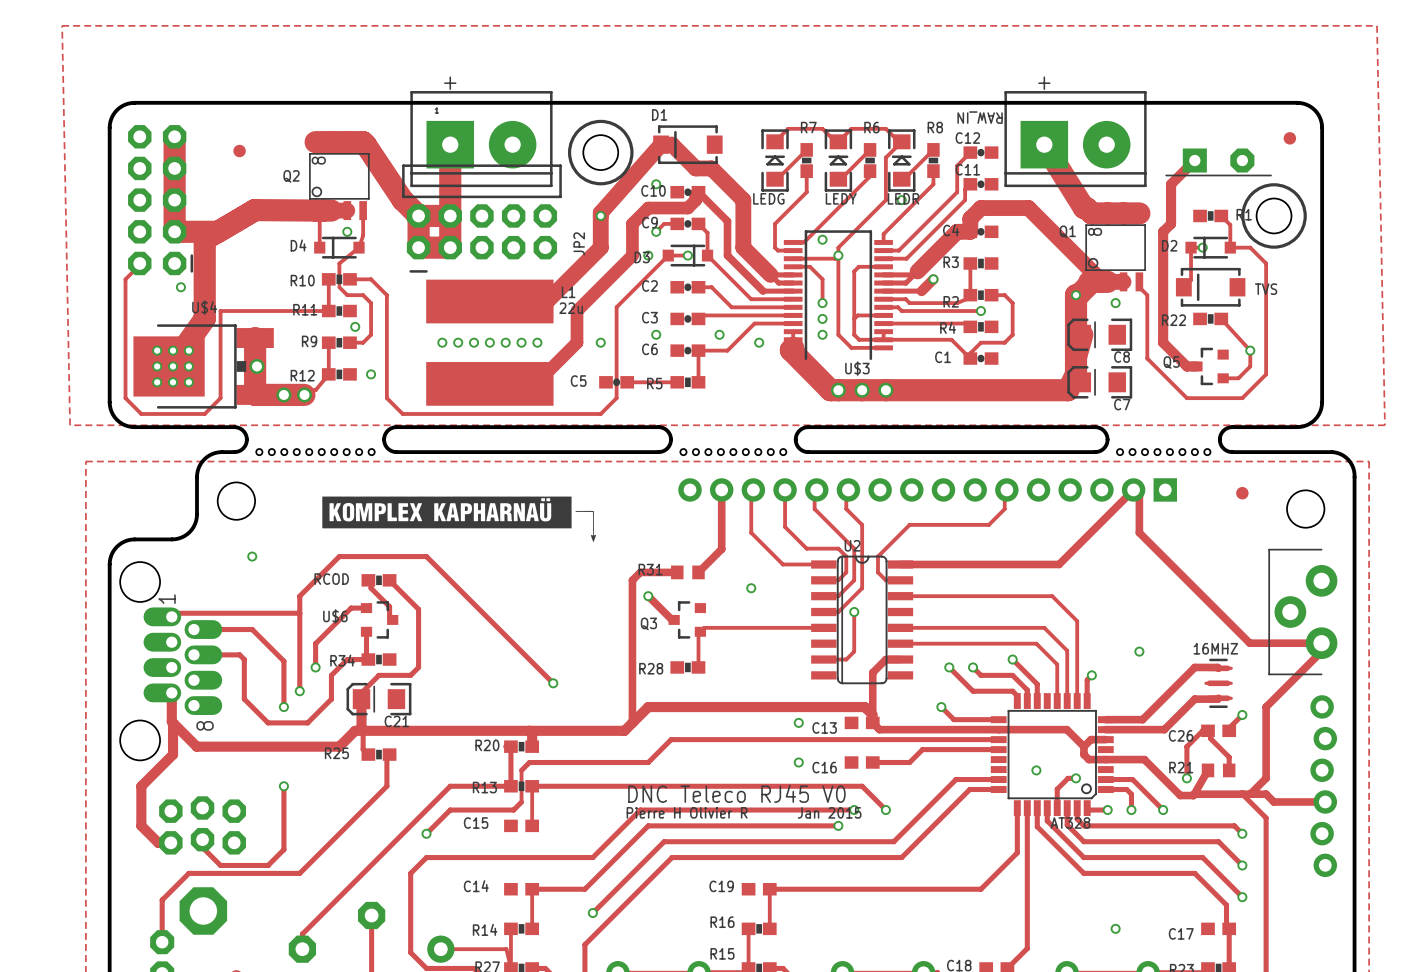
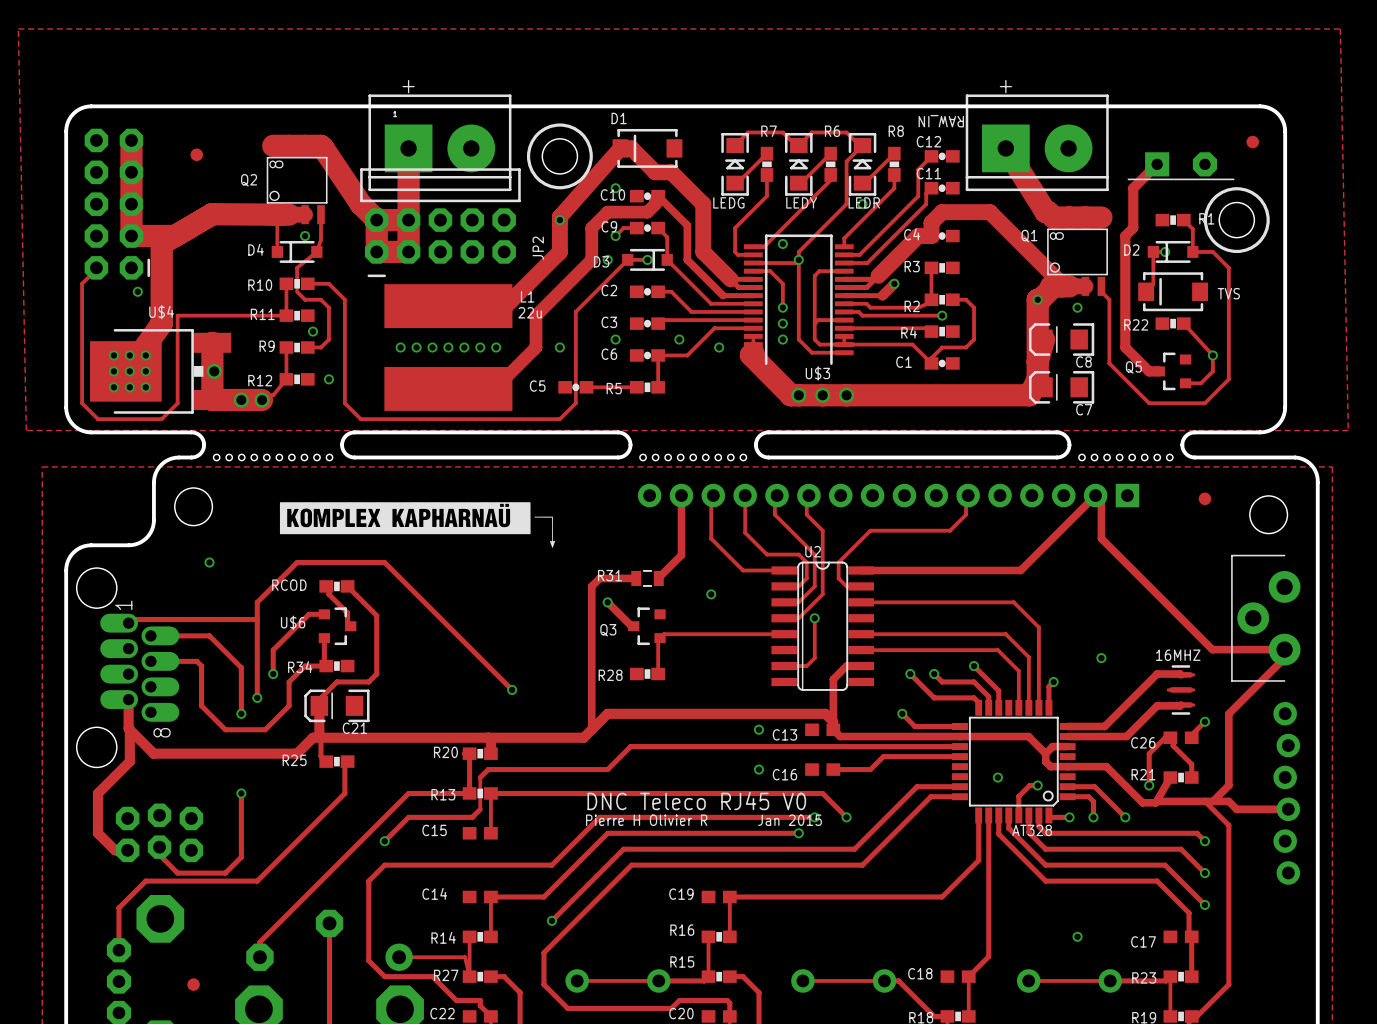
R31 footprint: [671, 565, 705, 580] -> [631, 569, 664, 587]
R21 footprint: [1201, 763, 1236, 778] -> [1163, 771, 1199, 784]

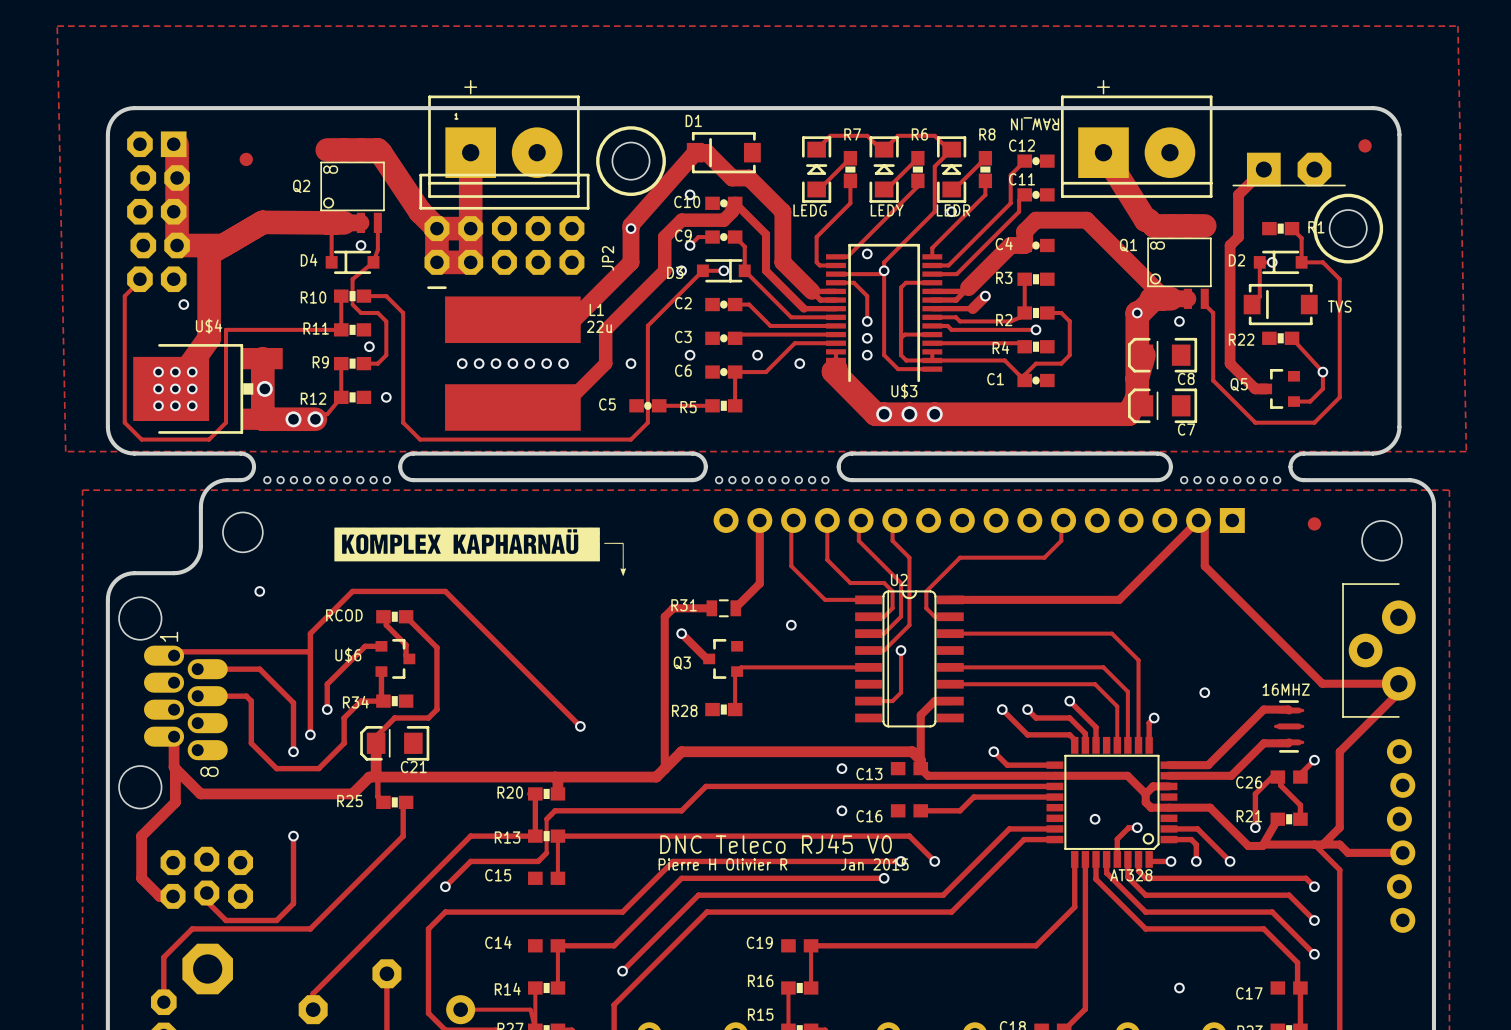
part footprint: [84, 128, 151, 280] -> [127, 131, 190, 293]
part footprint: [1127, 152, 1235, 181] -> [1232, 152, 1346, 187]

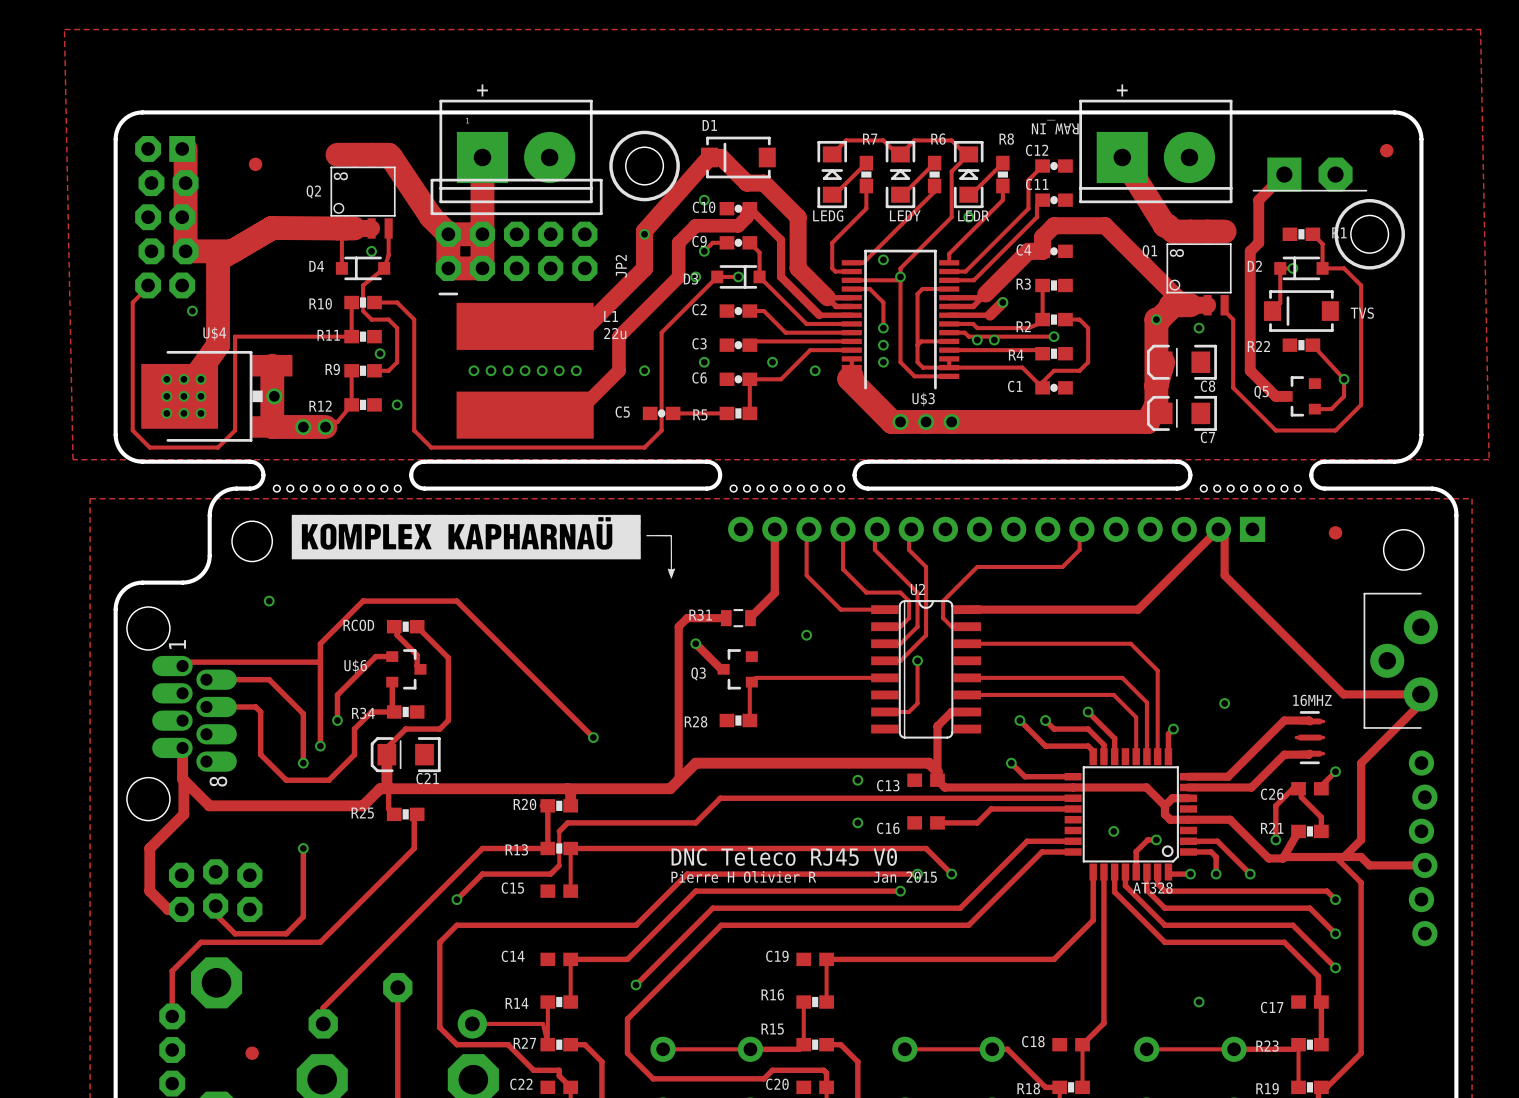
via: none -> (977, 340)
via: none -> (994, 340)
drawing: none -> [291, 514, 676, 579]
drawing: [334, 527, 627, 576] -> none

